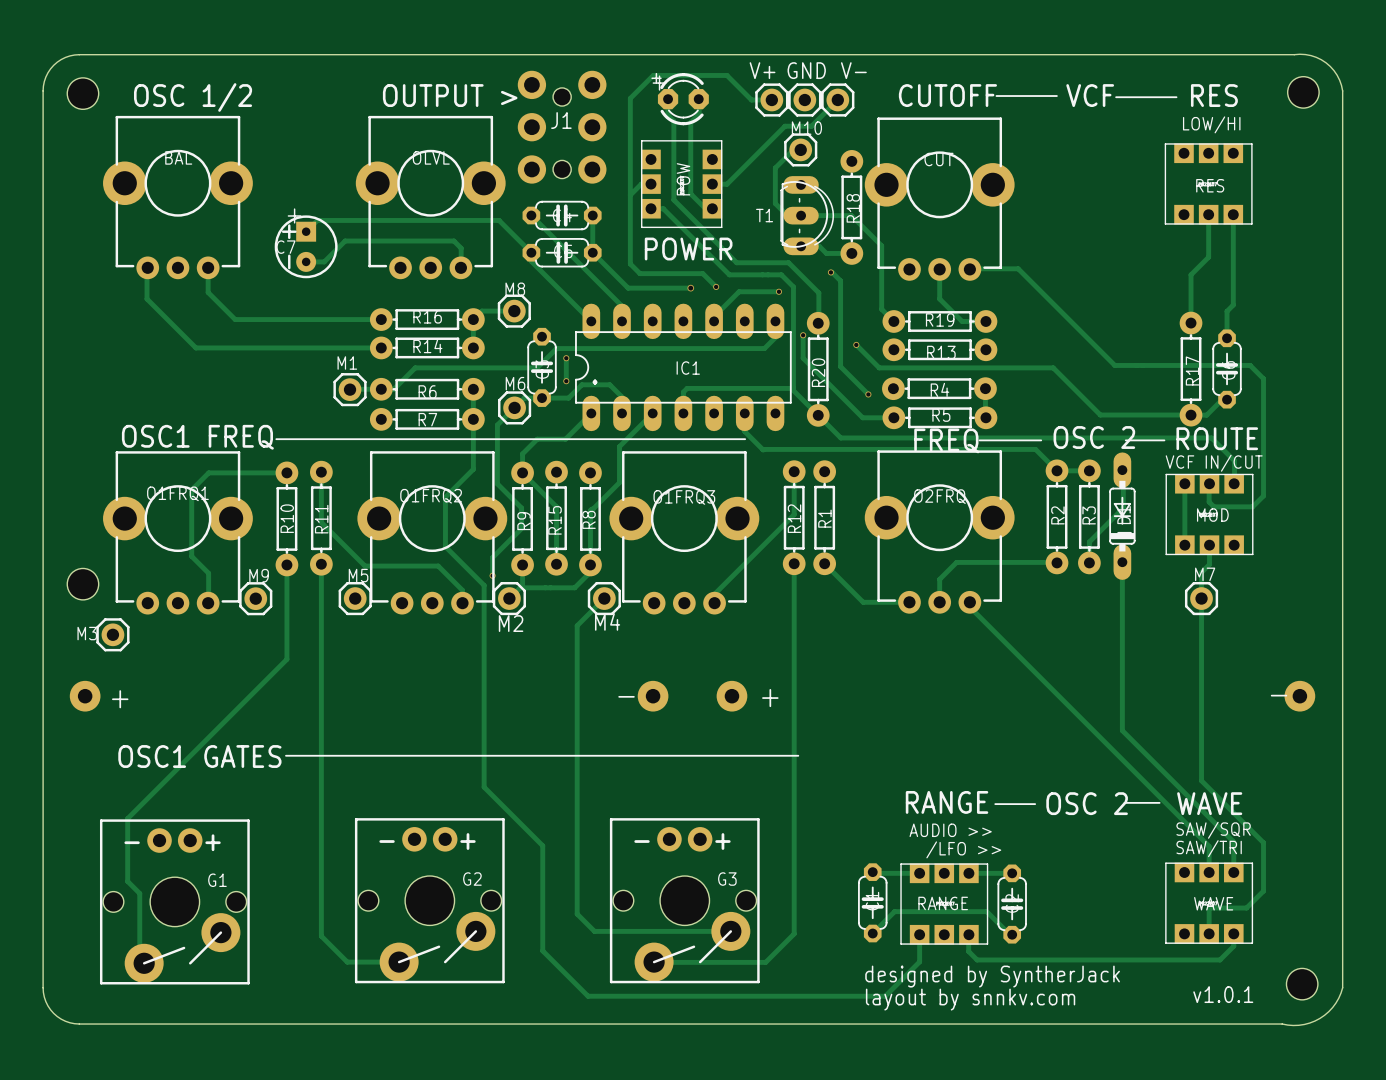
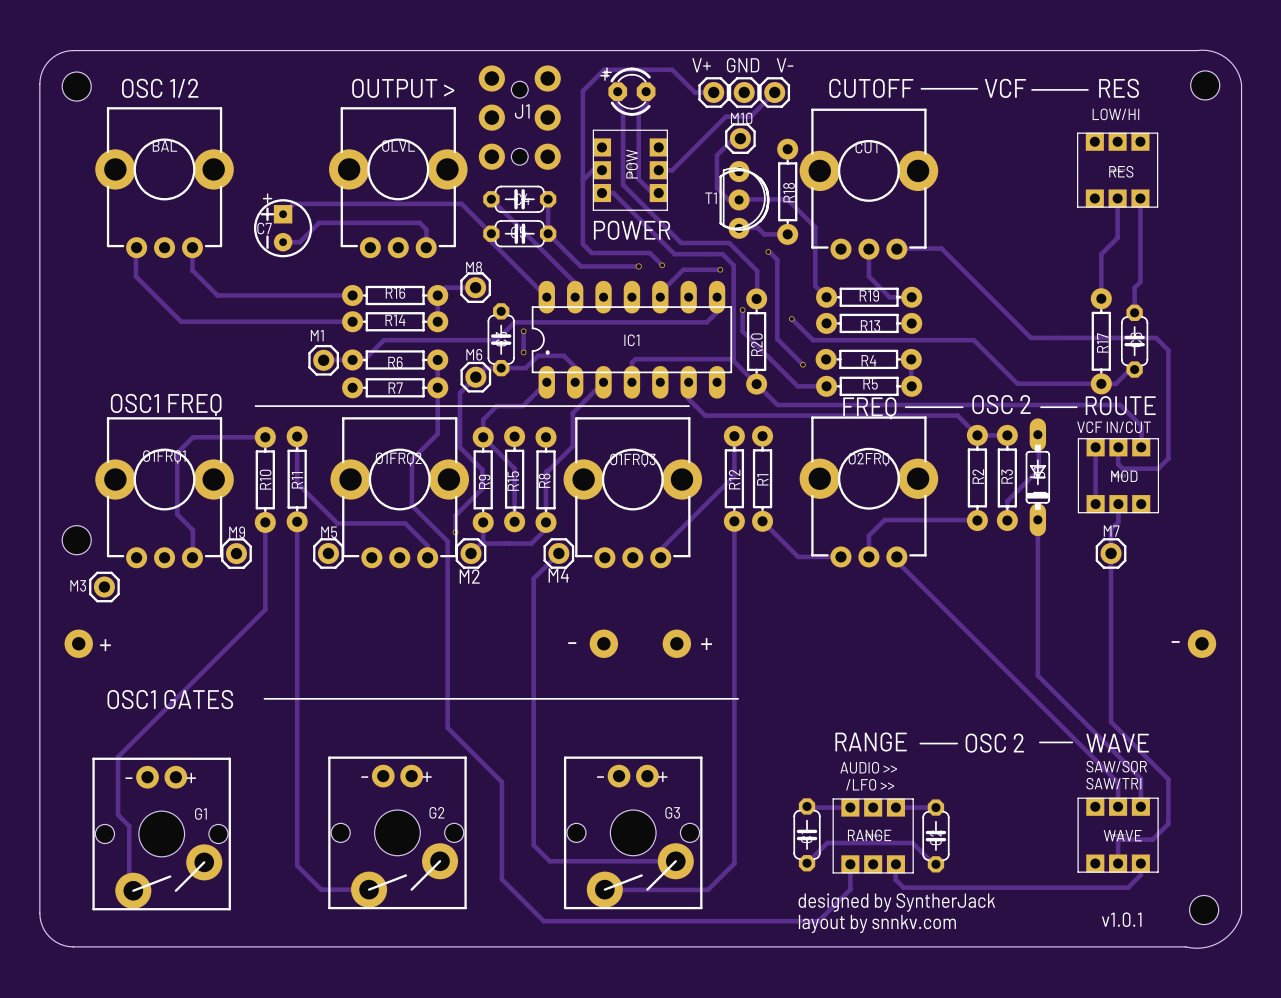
text: none -> T1 (711, 198)
T1: (807, 215) -> none
part: none -> (744, 199)

